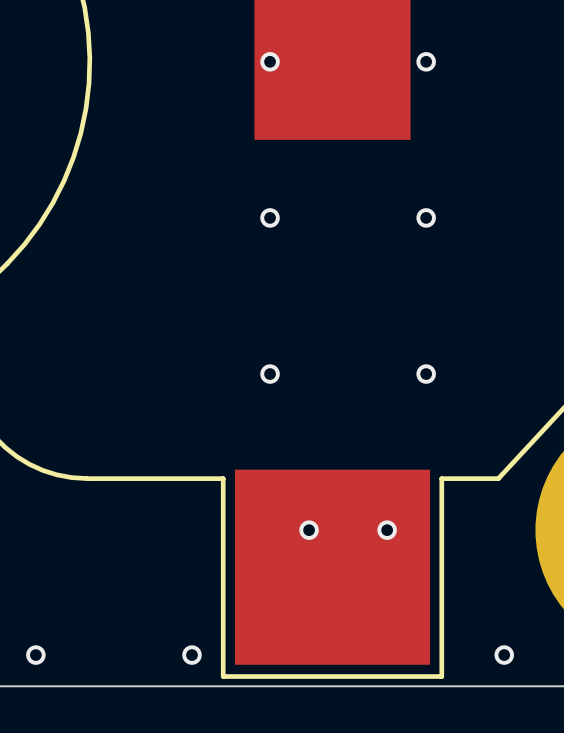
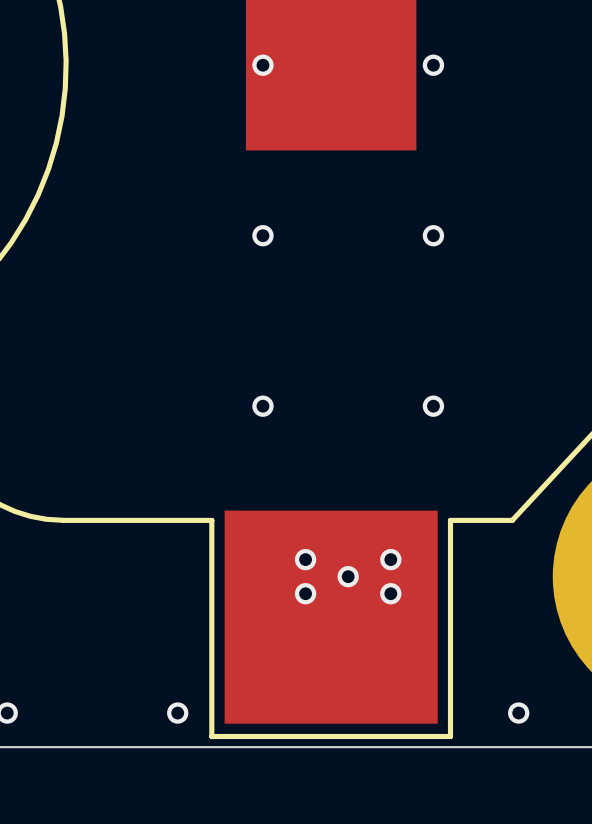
via: none -> (305, 559)
via: none -> (390, 559)
via: (309, 530) -> none
via: none -> (348, 576)
via: (387, 530) -> none
via: none -> (305, 593)
via: none -> (390, 593)

